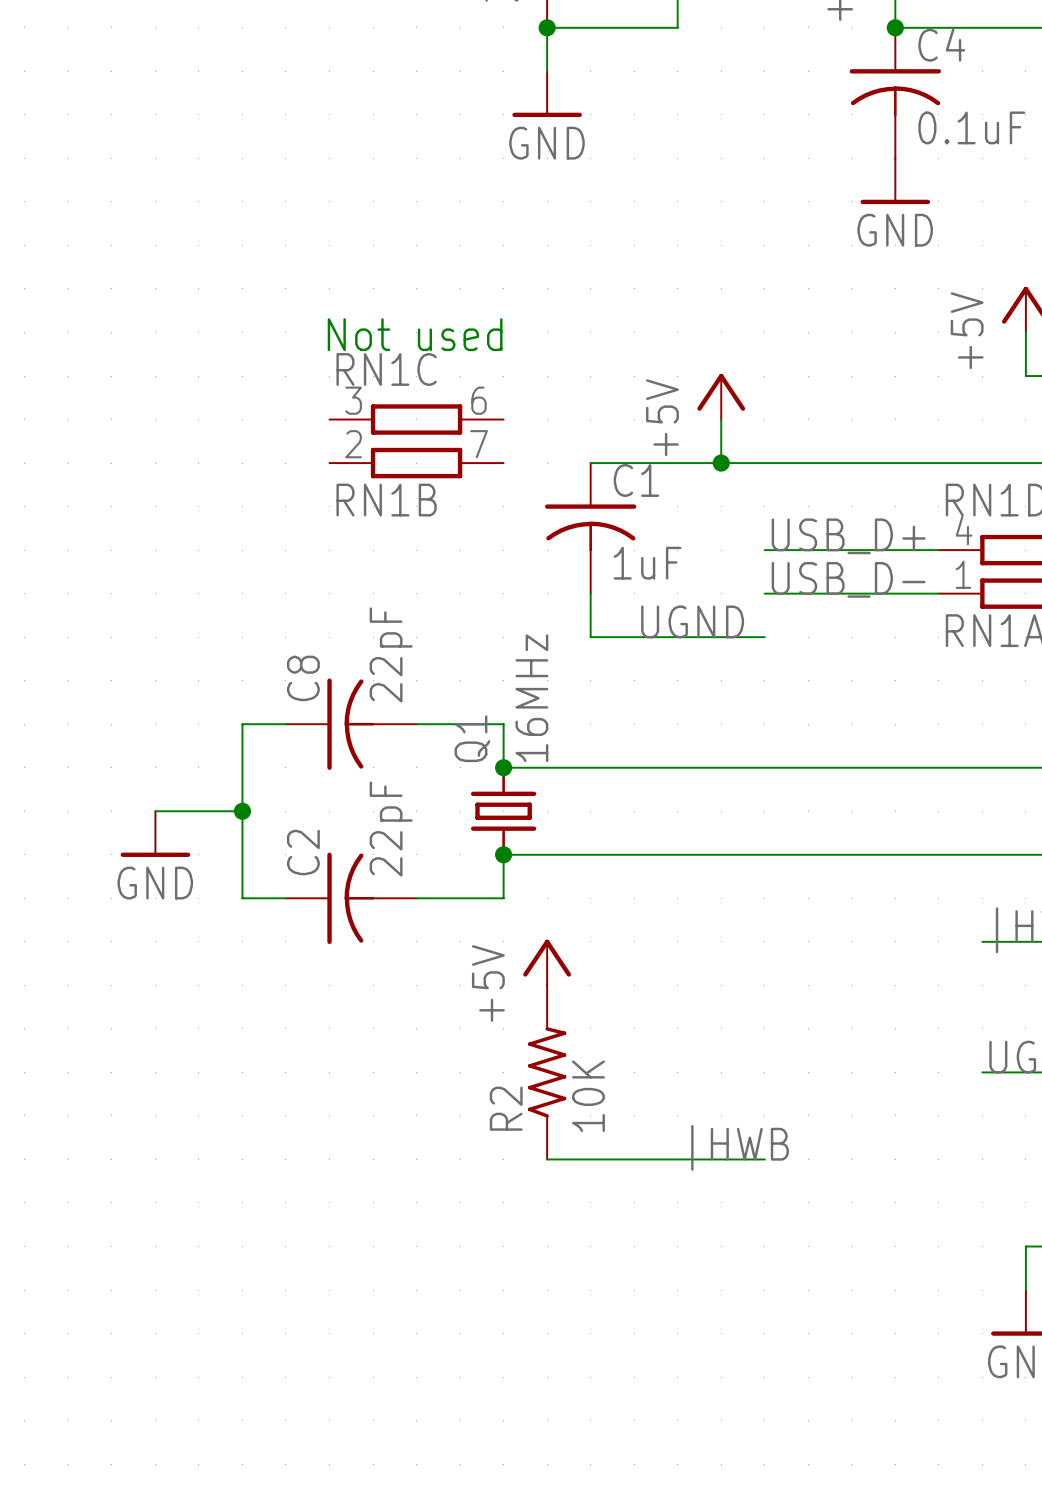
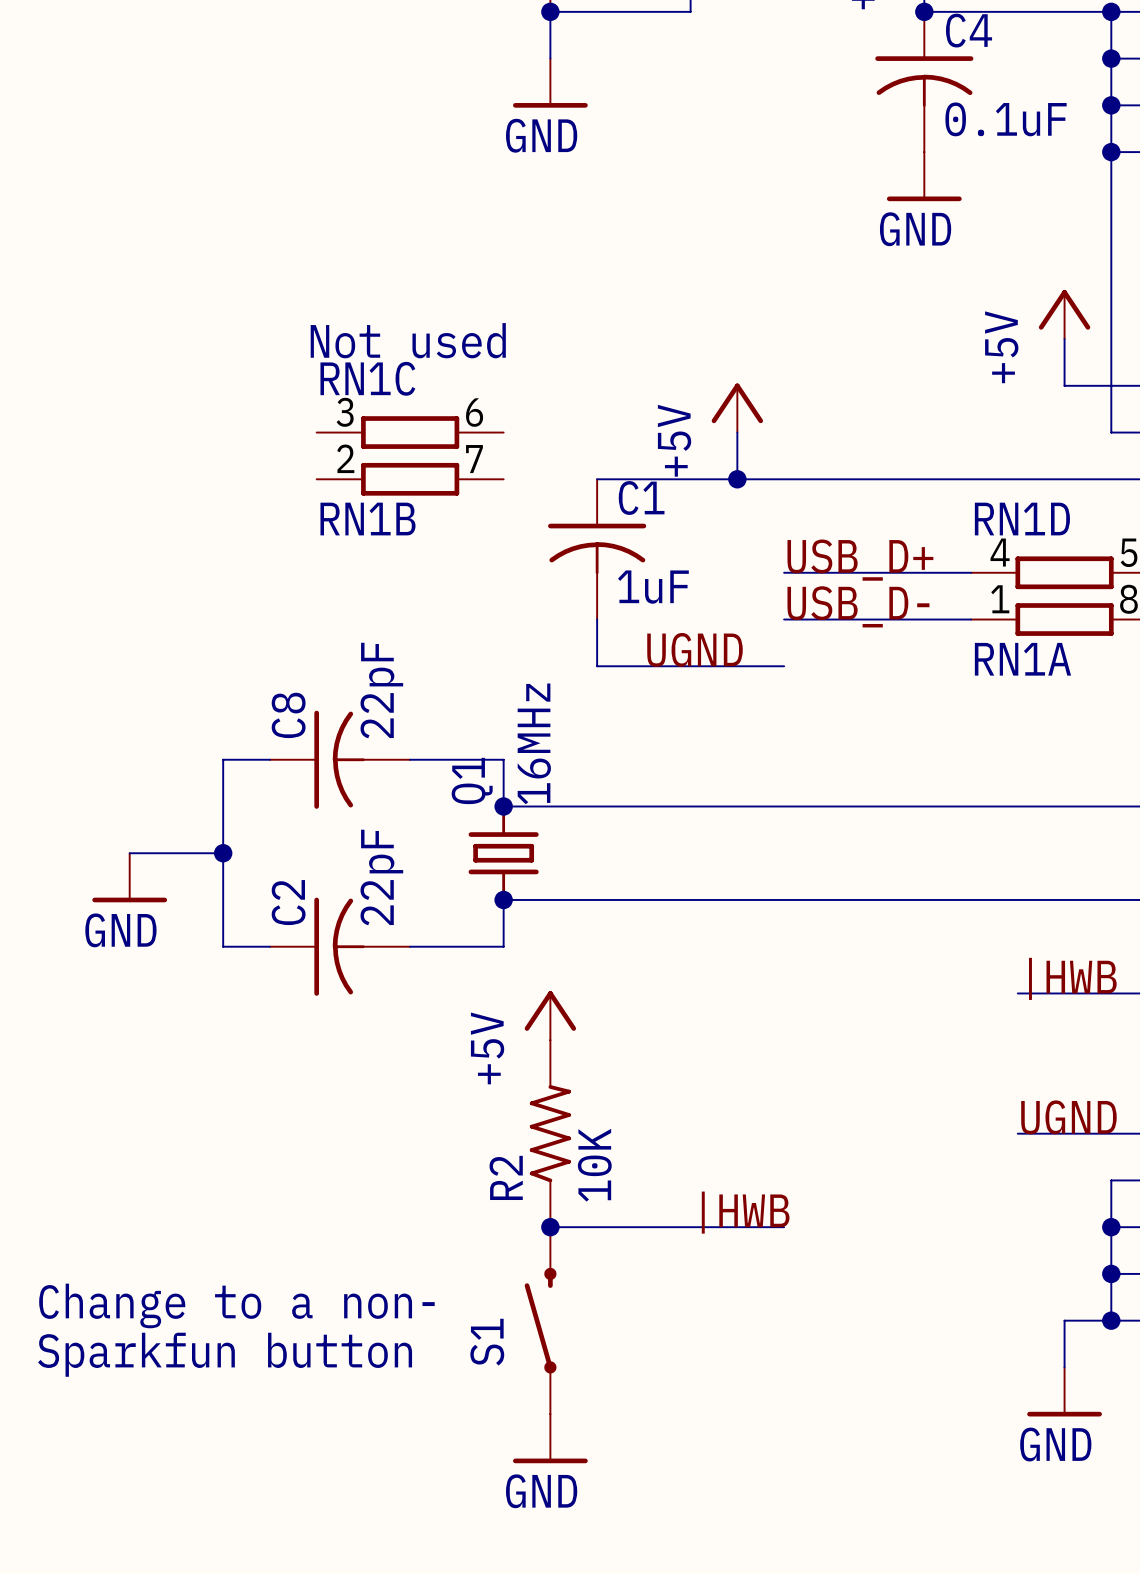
junction: none -> (550, 1227)
text: none -> Change to a non- (236, 1305)
S1: none -> (540, 1320)
text: none -> Sparkfun button (225, 1354)
power symbol: none -> GND (550, 1438)

